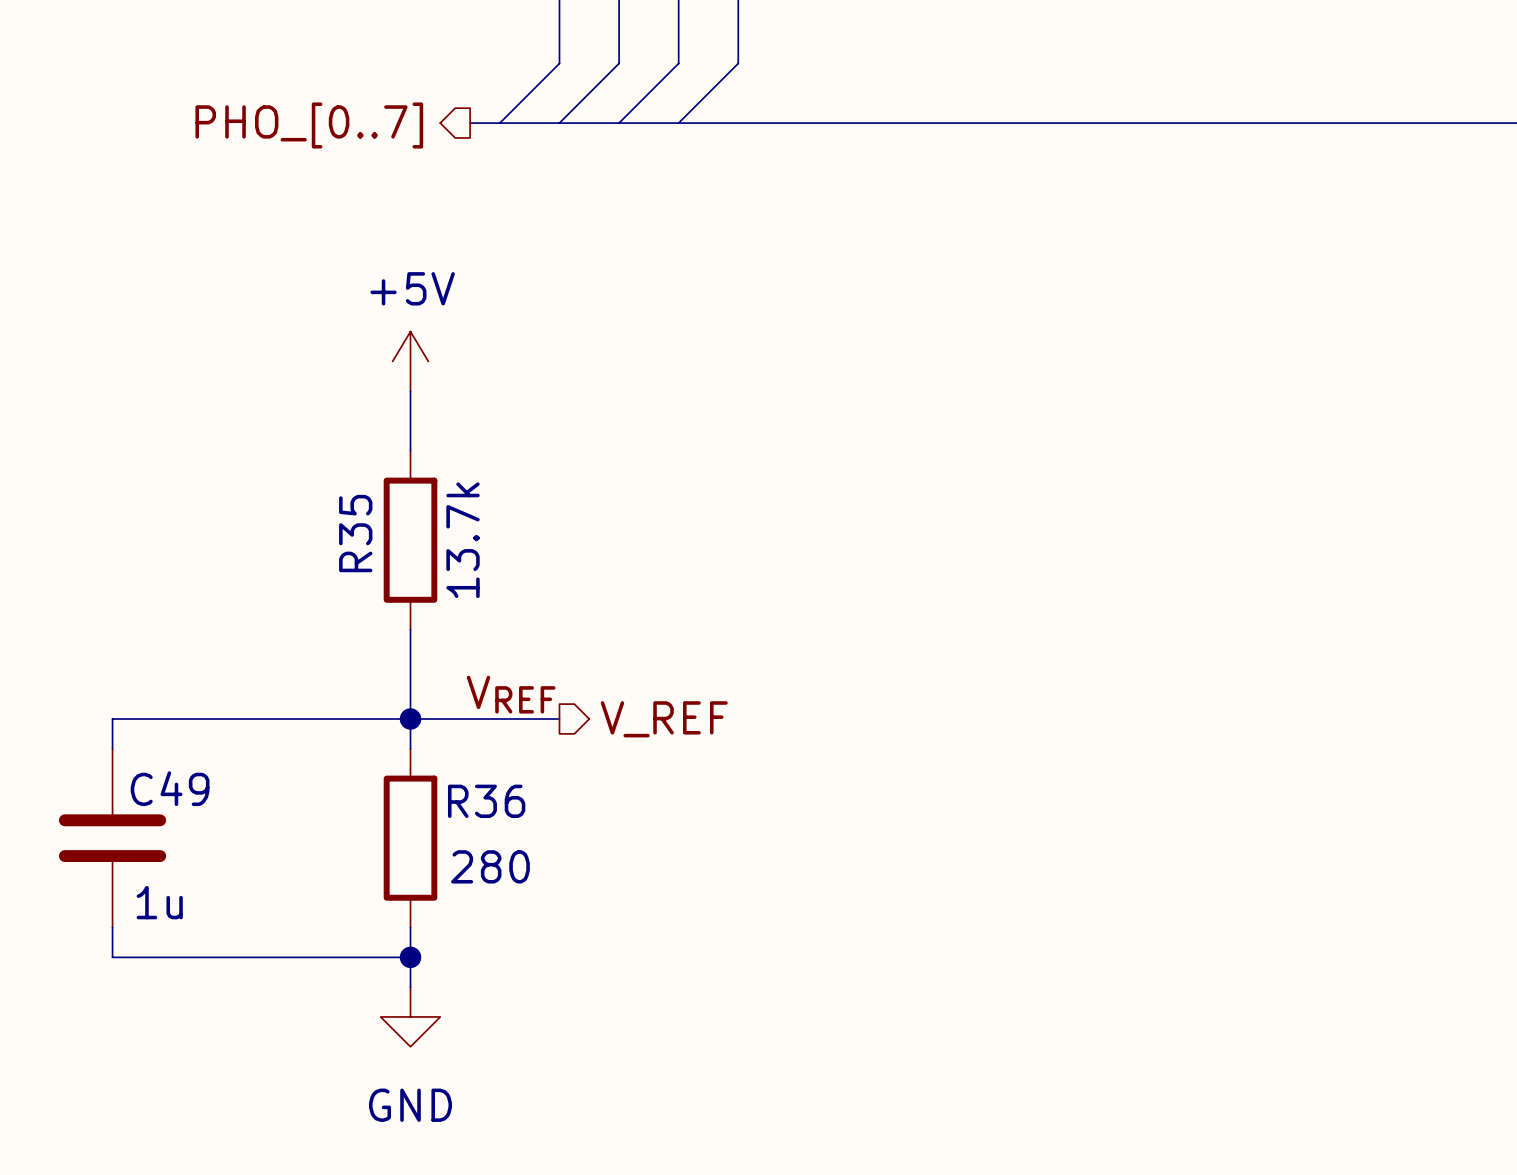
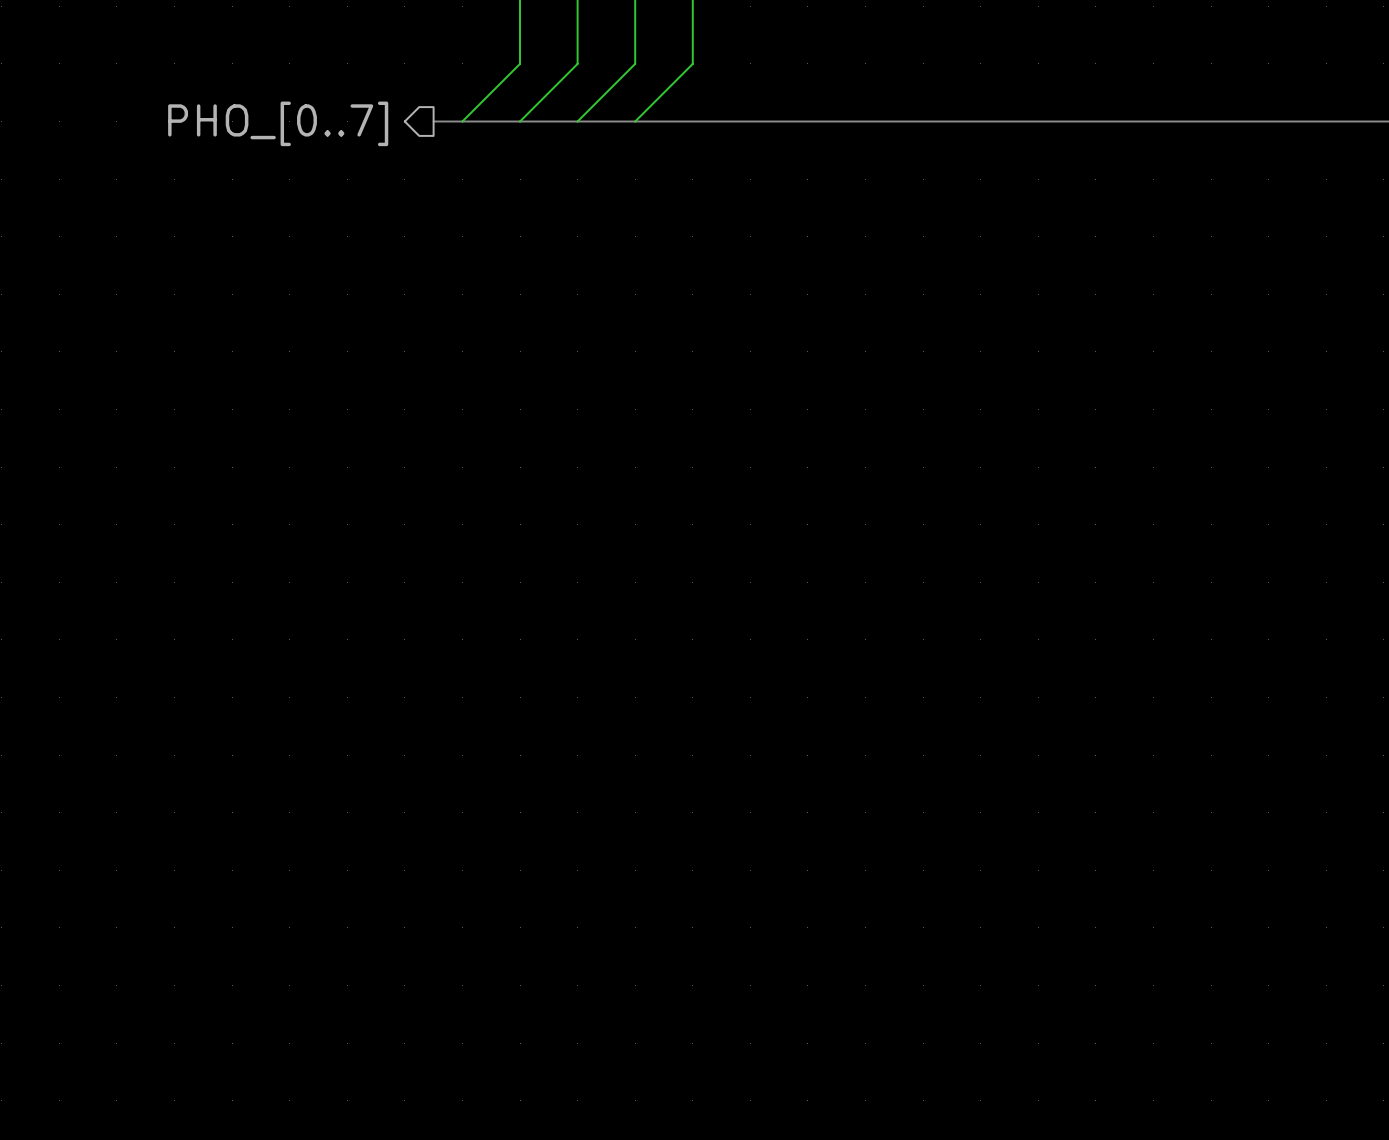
power symbol: +5V (410, 361) -> none
wire: (410, 391) (410, 450) -> none
R35: 13.7k (410, 540) -> none
wire: (410, 629) (410, 748) -> none
label: VREF (511, 694) -> none
junction: (410, 719) -> none
wire: (559, 719) (112, 719) (112, 748) -> none
hierarchical label: V_REF (664, 719) -> none
C49: 1u (112, 838) -> none
R36: 280 (410, 838) -> none
wire: (112, 927) (112, 957) (410, 957) -> none
wire: (410, 927) (410, 987) -> none
junction: (410, 957) -> none
power symbol: GND (410, 1016) -> none

